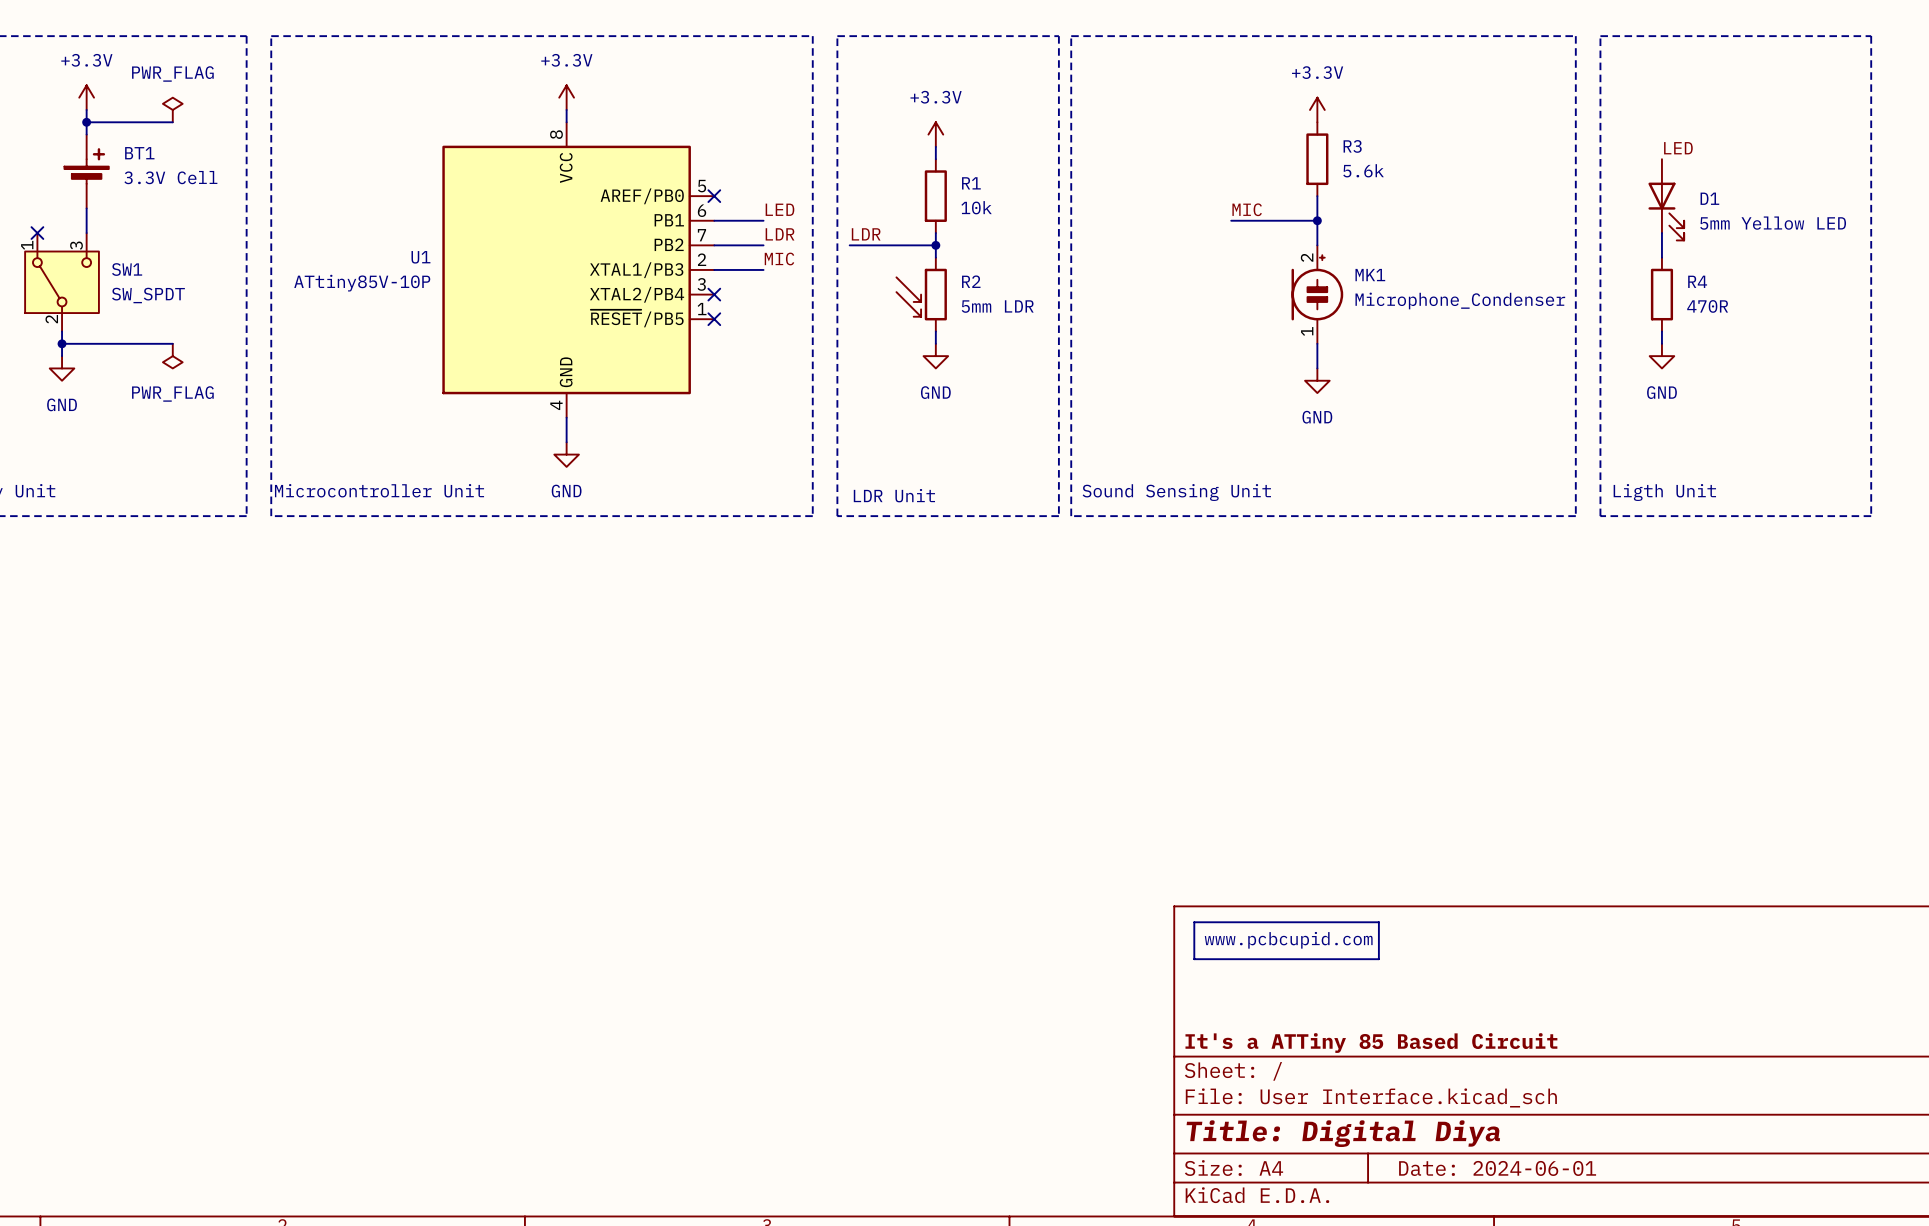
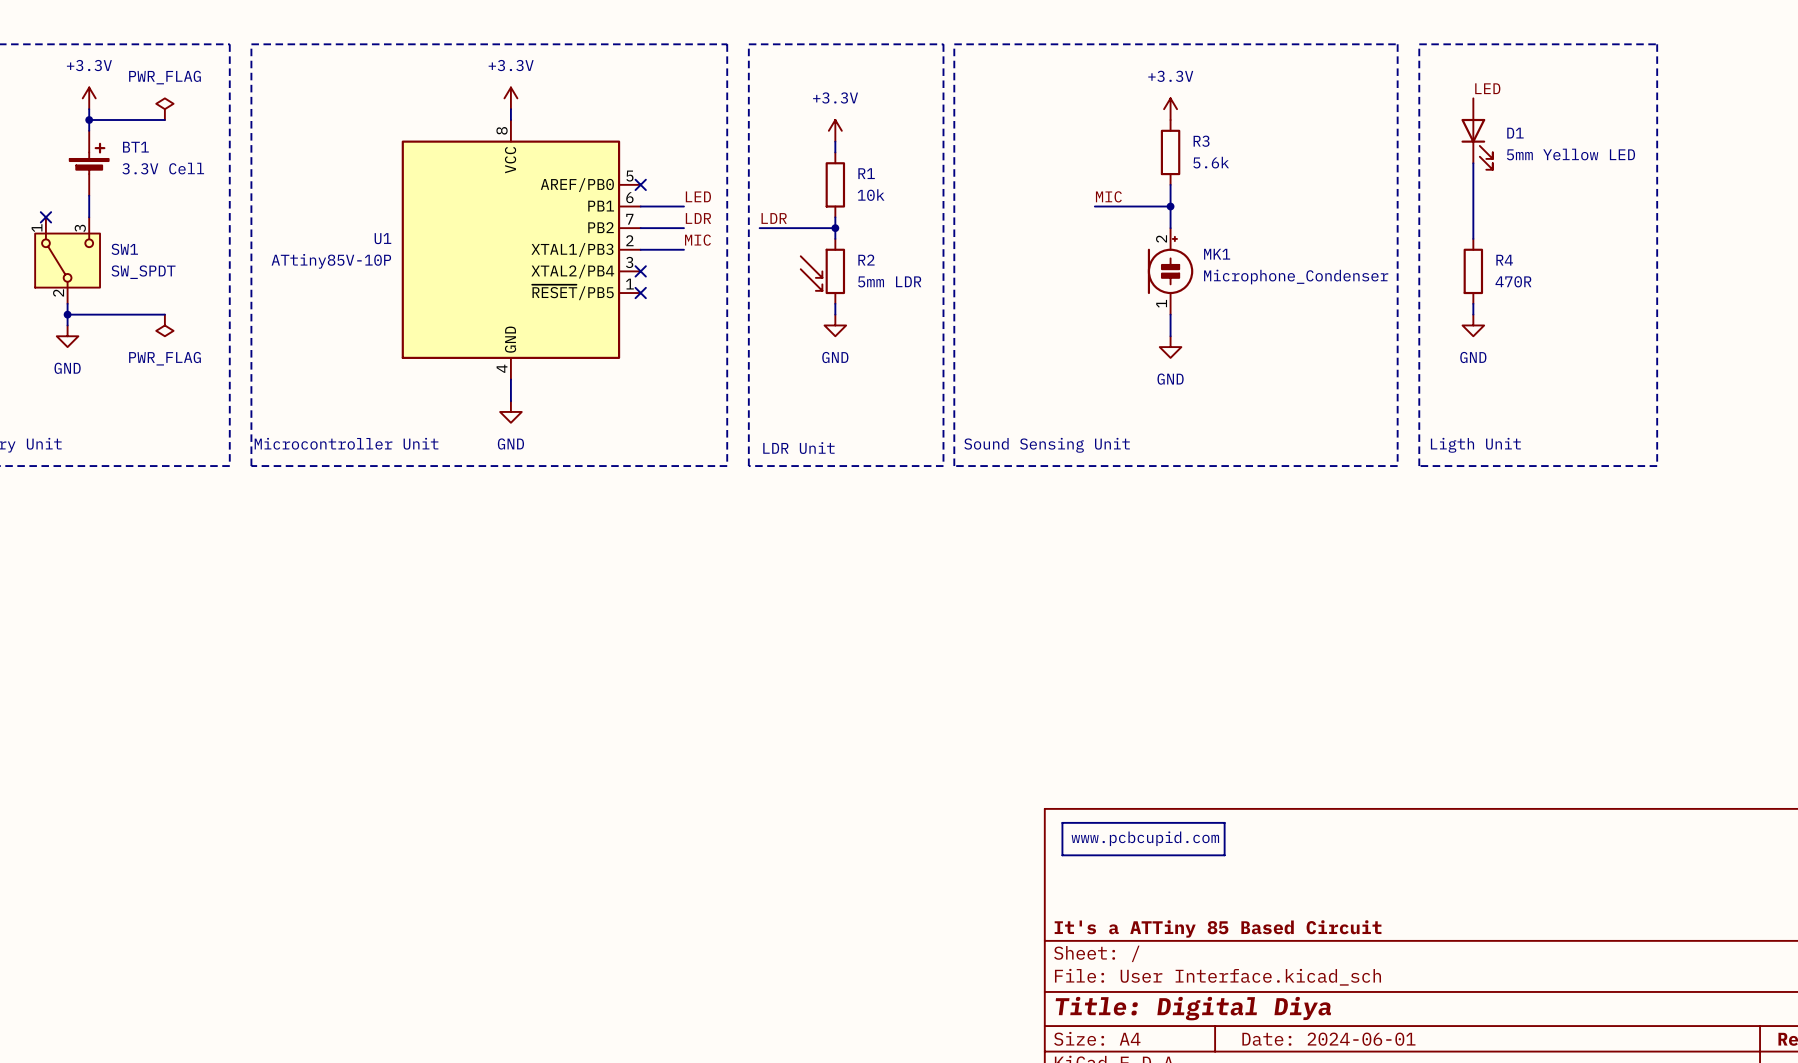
label position: LED (1678, 148) -> LED (1487, 88)
D1 position: (1666, 199) -> (1477, 134)

